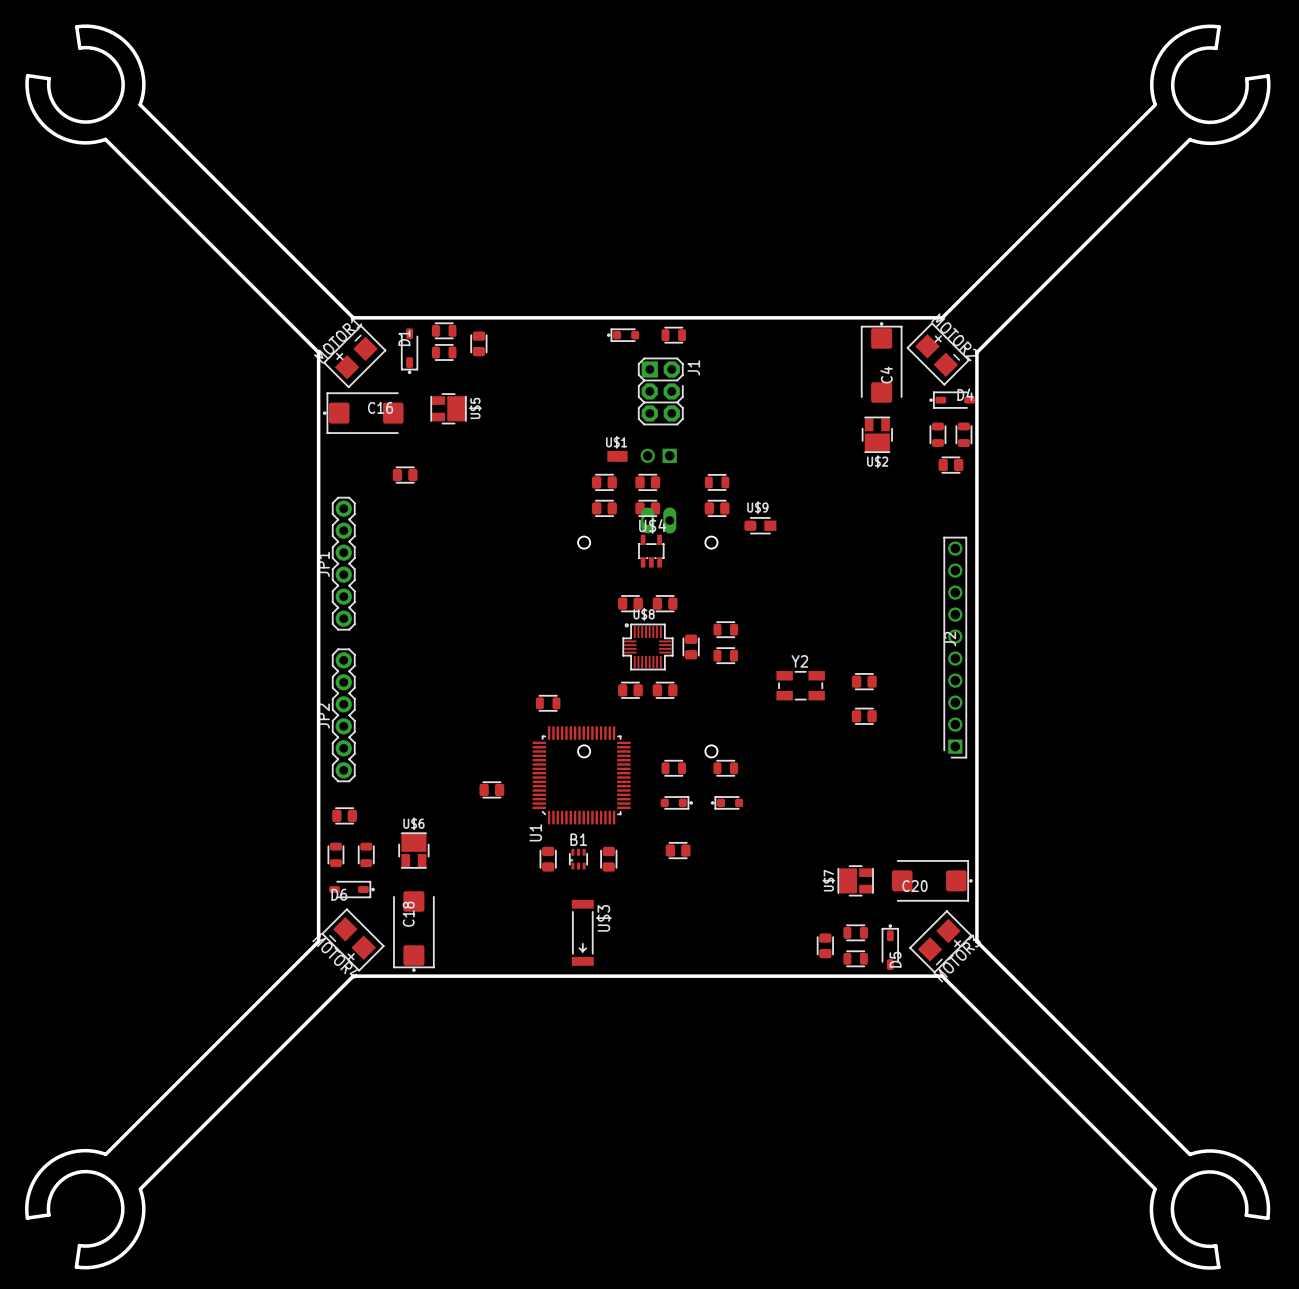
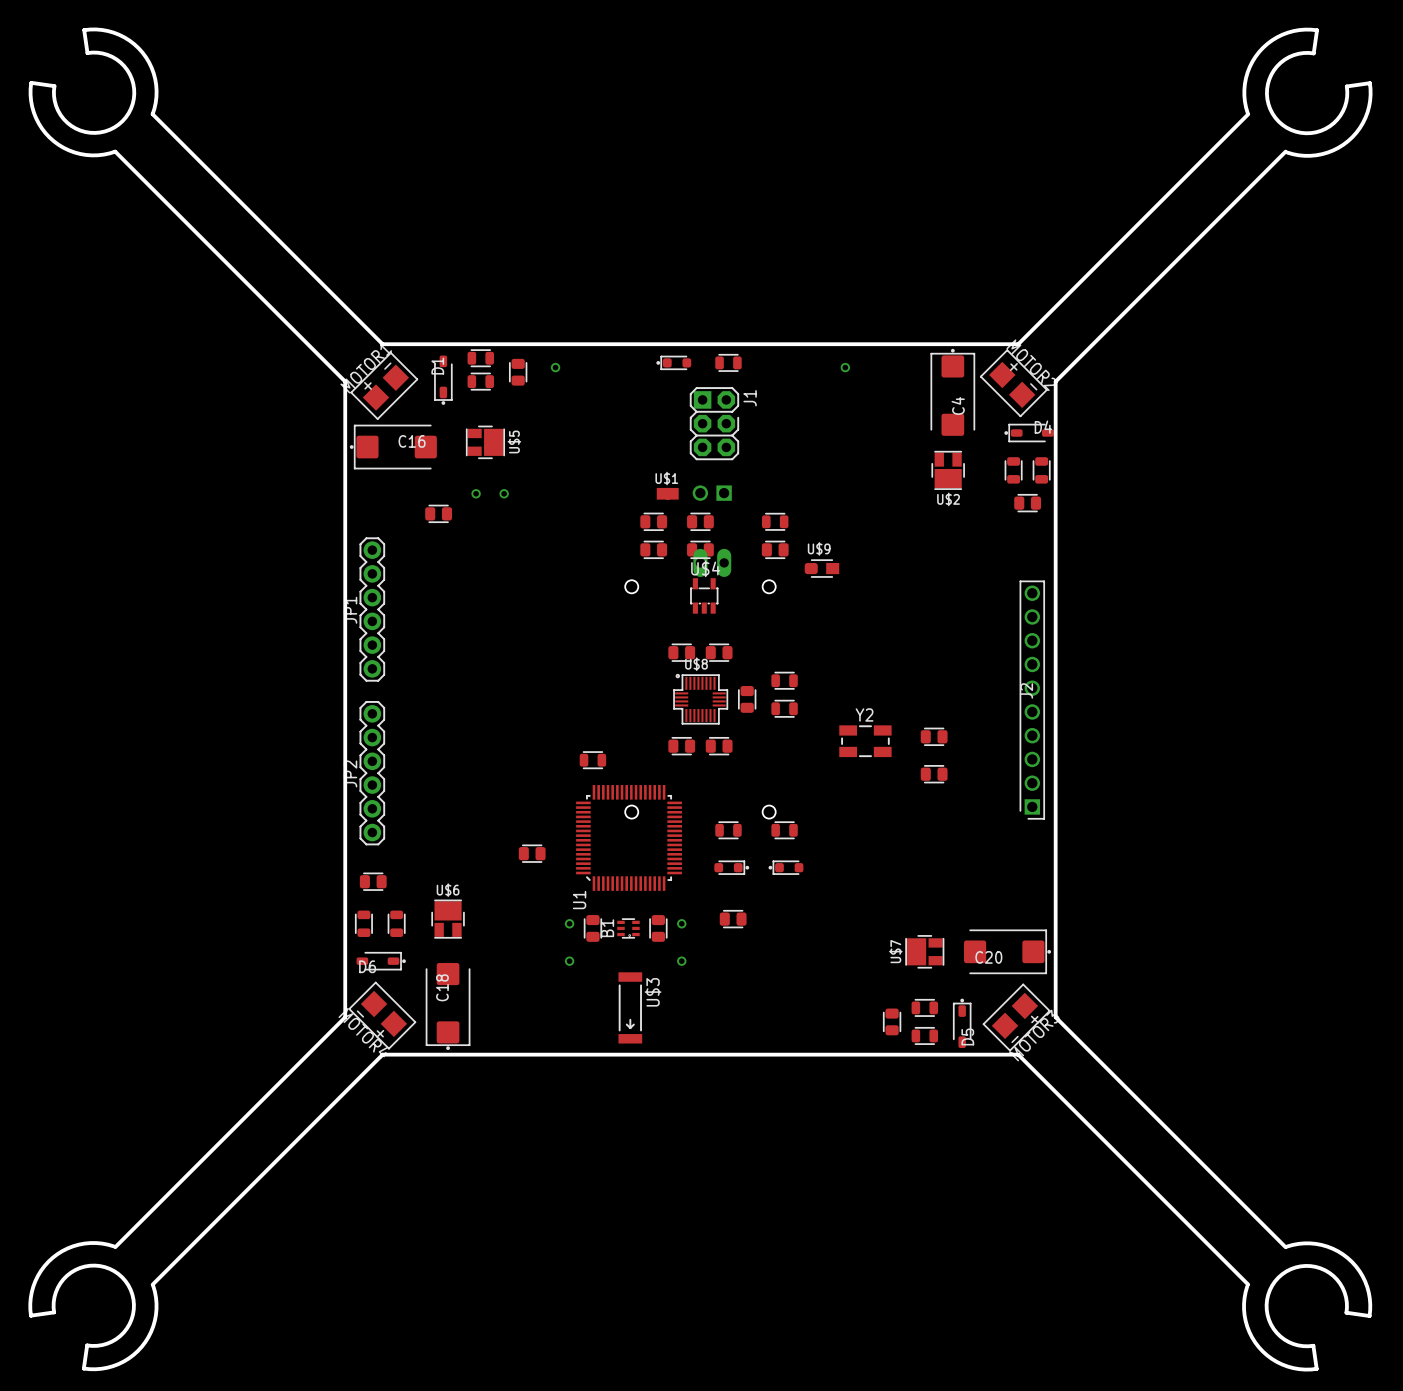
via: none -> (555, 367)
via: none -> (845, 367)
via: none -> (476, 493)
via: none -> (504, 493)
via: none -> (569, 923)
via: none -> (681, 923)
B1 rotation: 0° (578, 859) -> 90° counterclockwise (628, 928)
via: none -> (569, 961)
via: none -> (681, 961)

